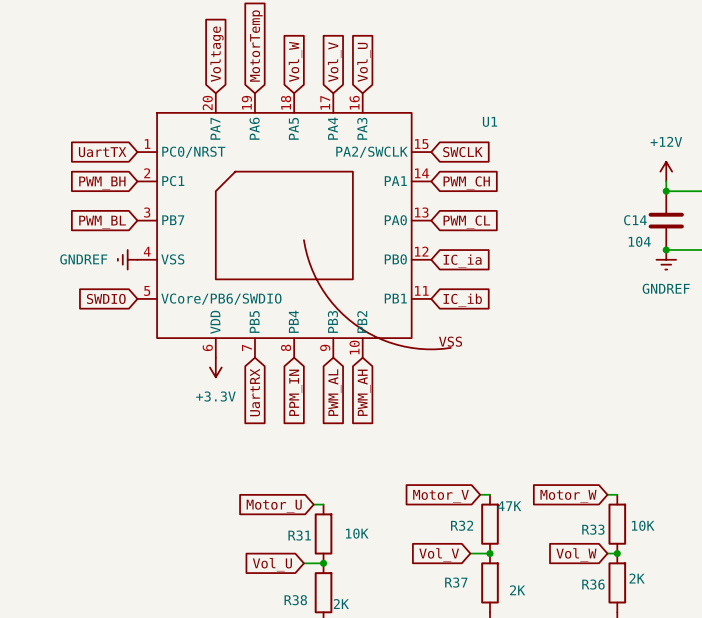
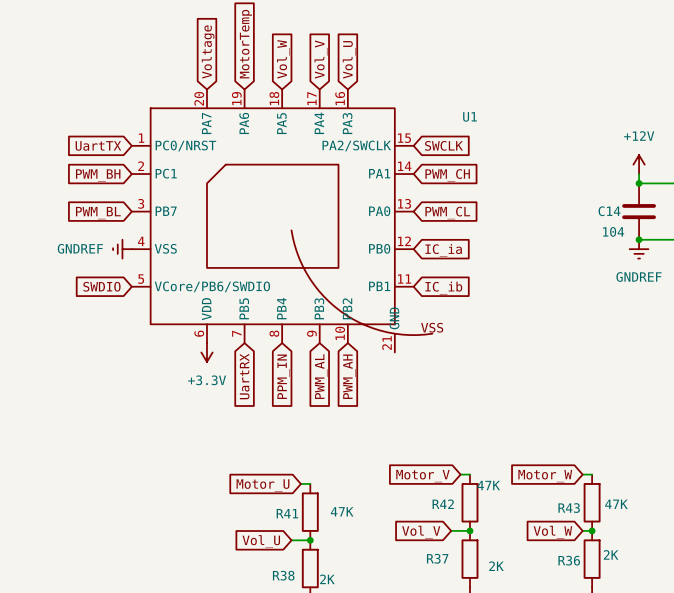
U1 symbol: [137, 93, 451, 358] -> [131, 89, 433, 353]
R32 name: R32 (462, 525) -> R42 (443, 504)
R33 value: 10K (643, 525) -> 47K (616, 504)
R33 name: R33 (593, 529) -> R43 (569, 508)
R31 value: 10K (357, 533) -> 47K (342, 511)
R31 name: R31 (299, 535) -> R41 (287, 513)

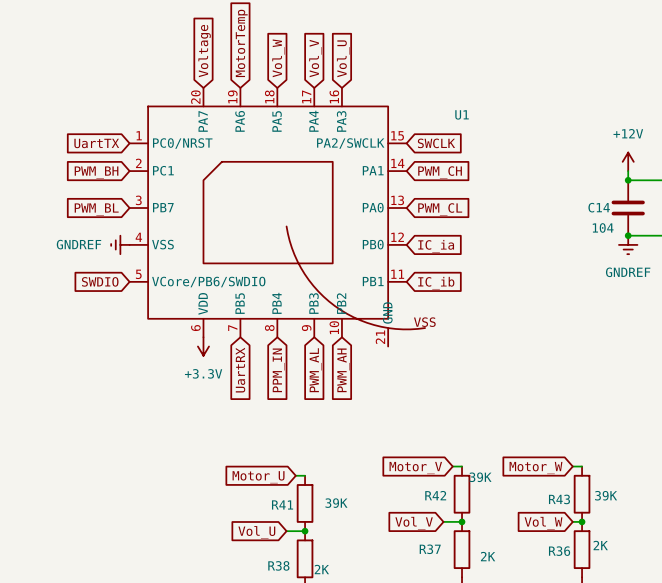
R42 value: 47K (488, 485) -> 39K (480, 477)
R43 value: 47K (616, 504) -> 39K (606, 495)
R41 value: 47K (342, 511) -> 39K (336, 503)

